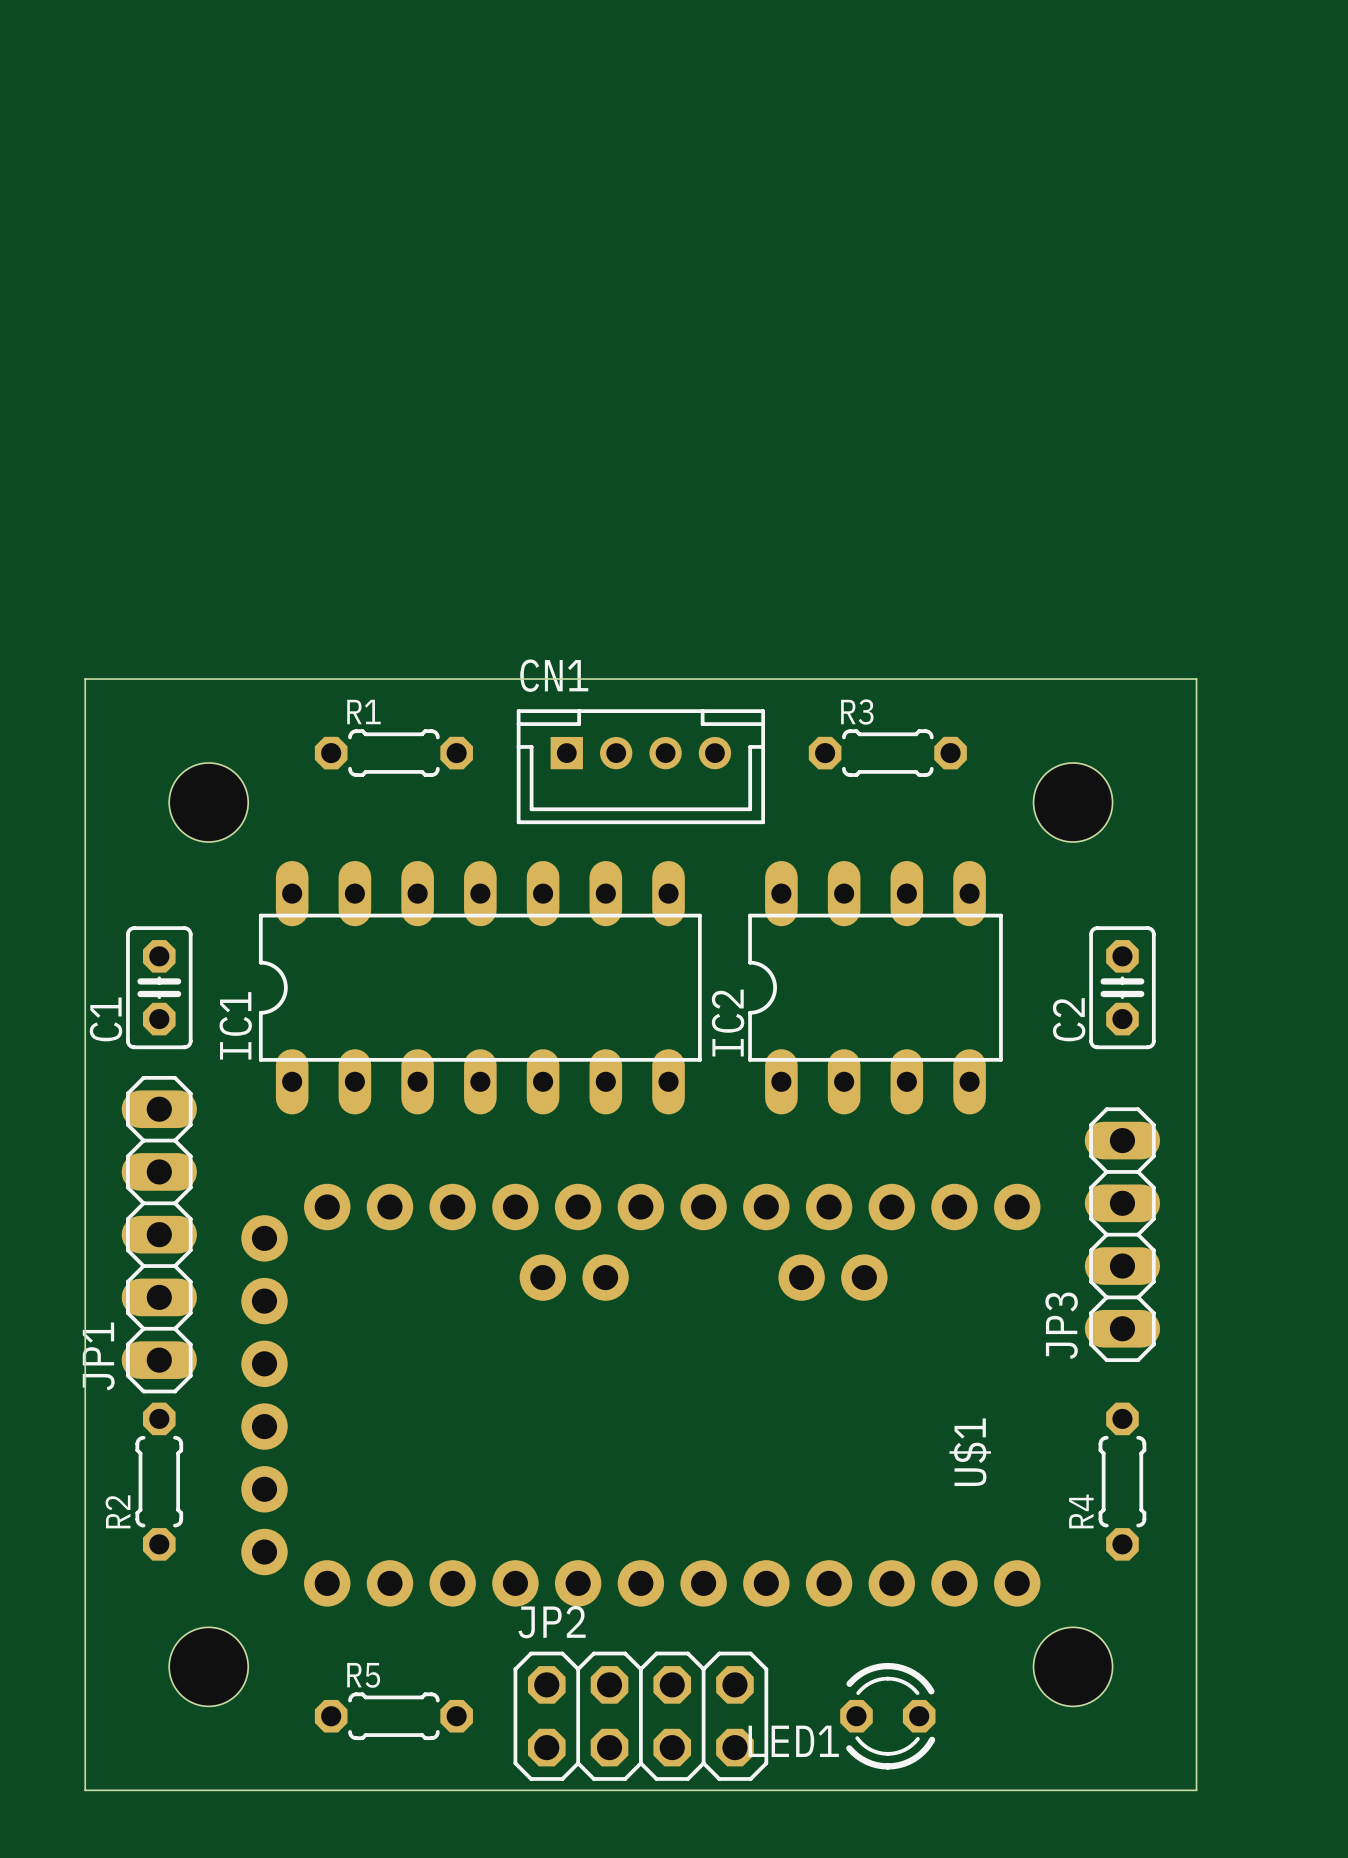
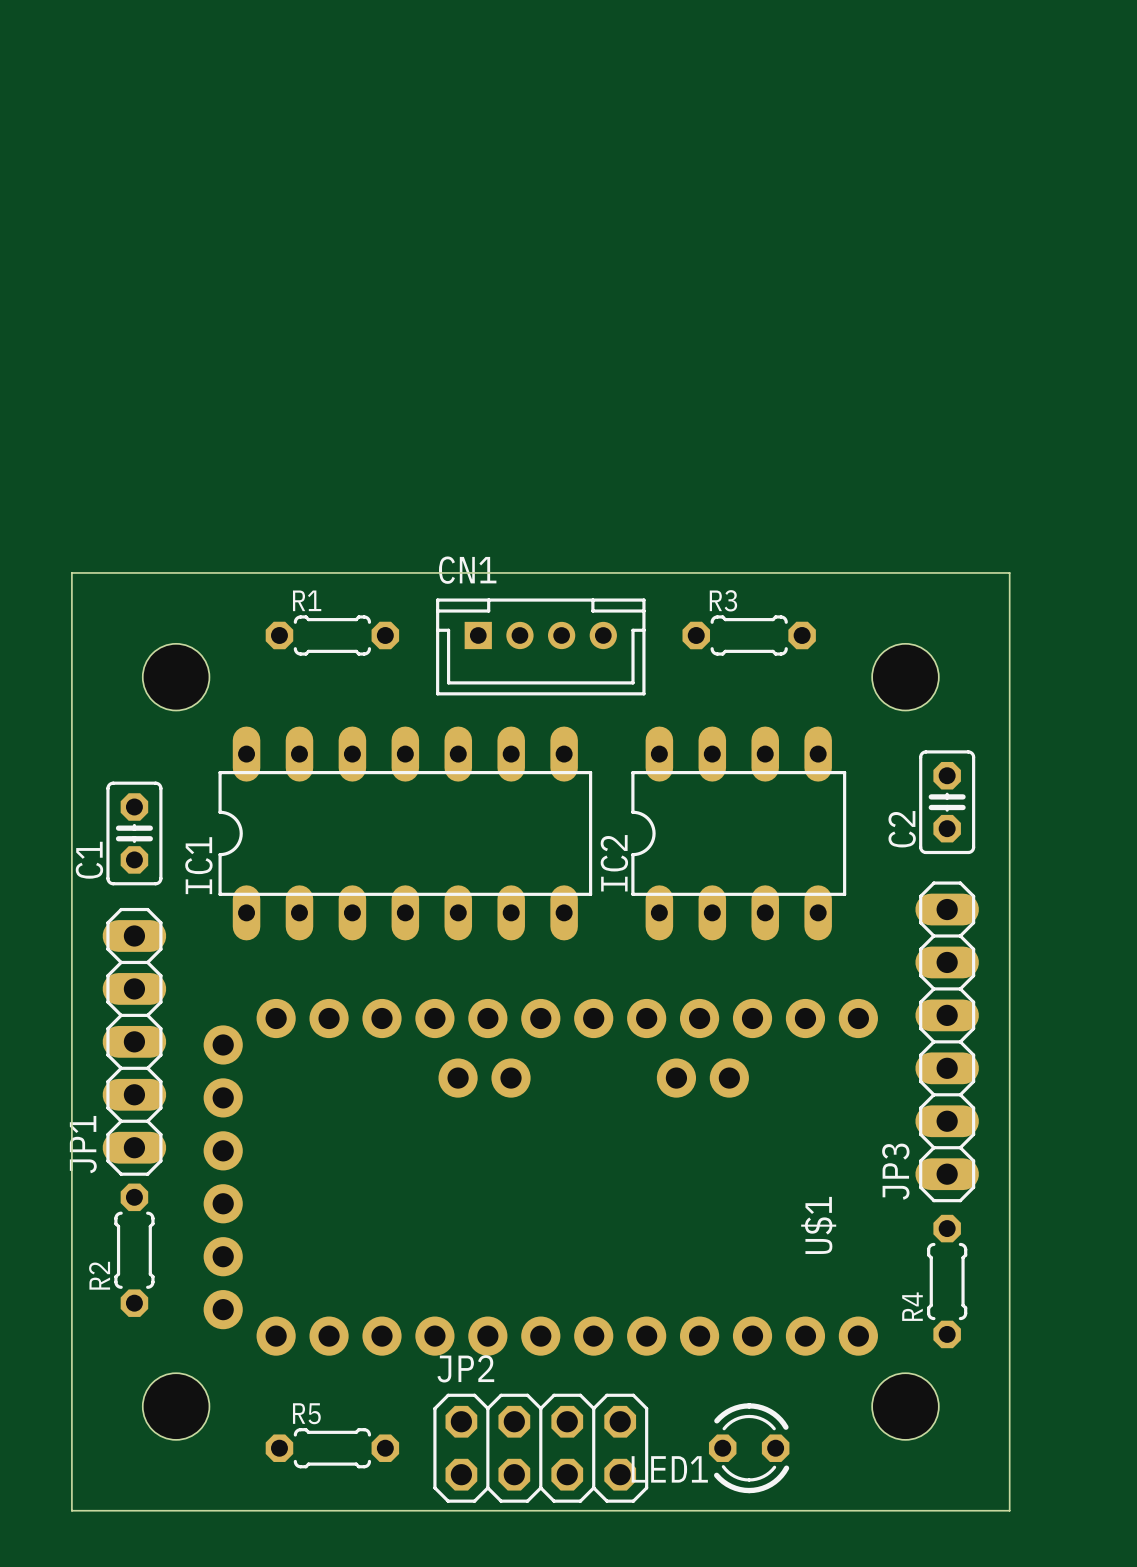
C2 position: (1122, 987) -> (947, 802)
JP3 footprint: [1084, 1107, 1161, 1363] -> [915, 881, 979, 1203]
JP3 name position: JP3 (1061, 1325) -> JP3 (895, 1171)
R4 position: (1122, 1481) -> (947, 1281)

